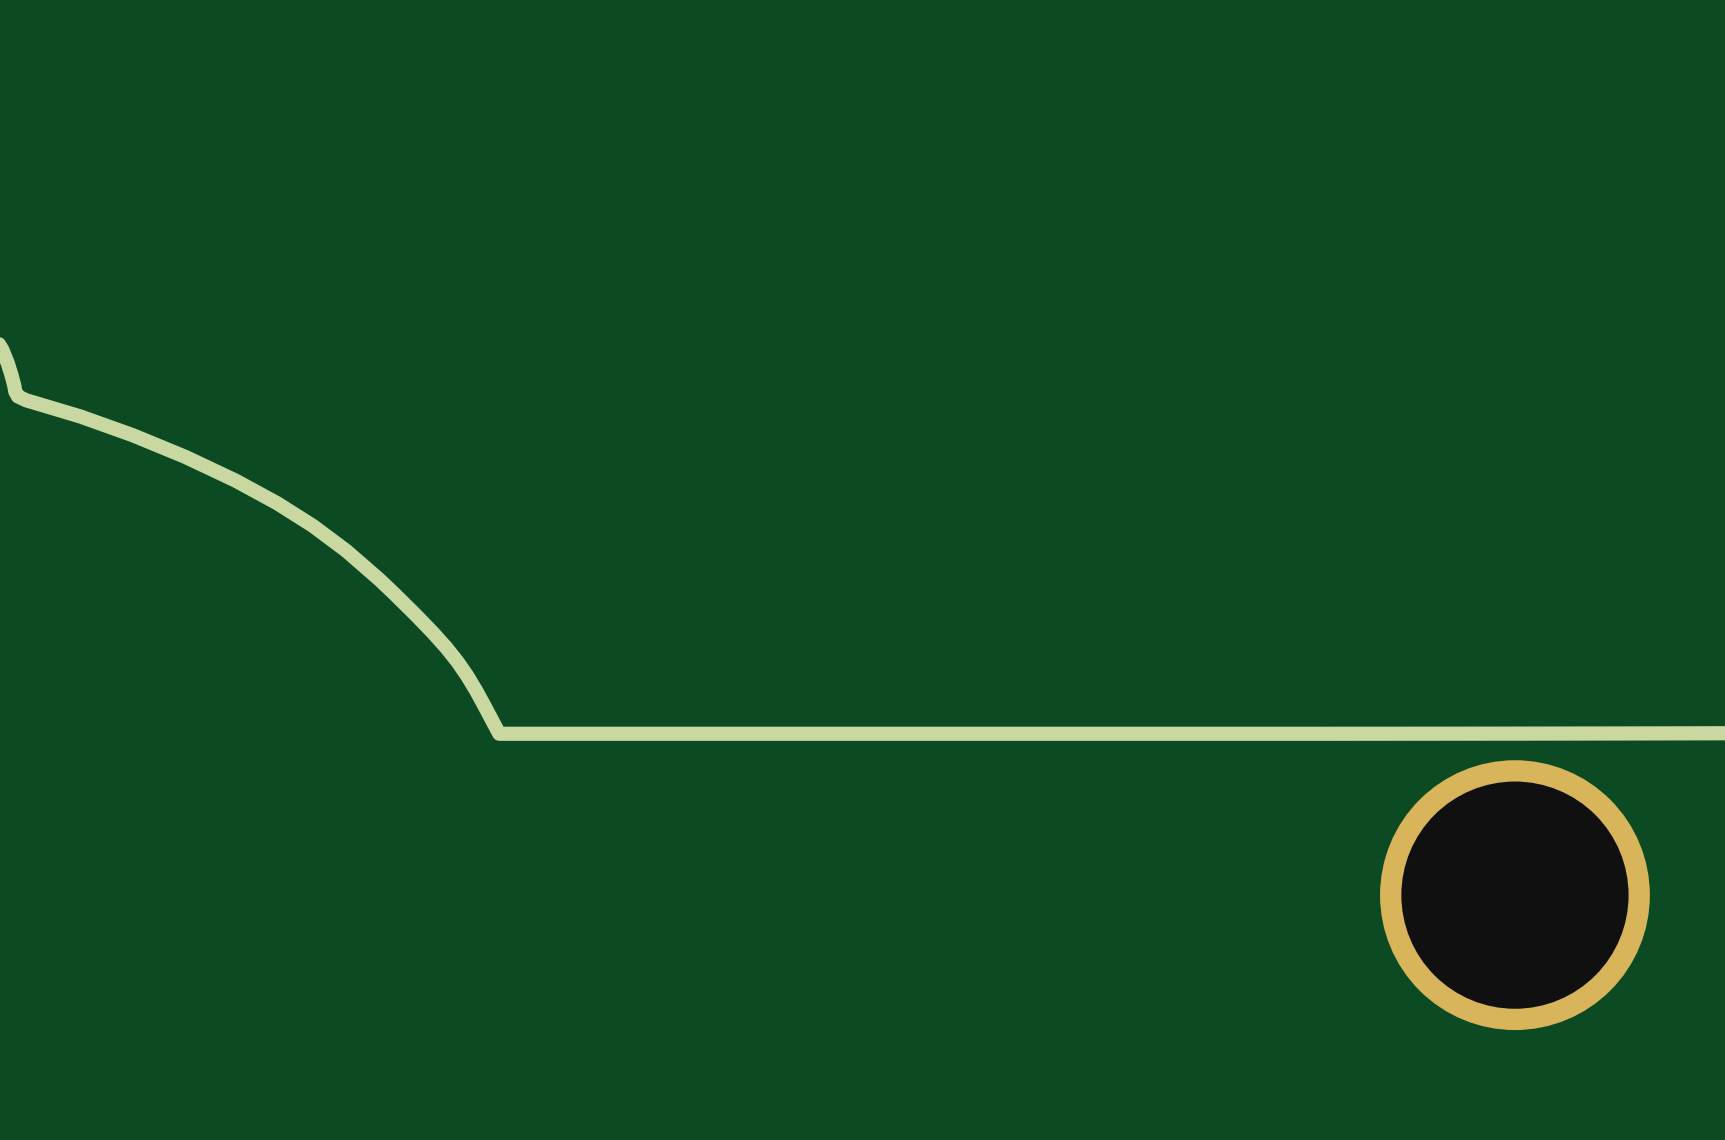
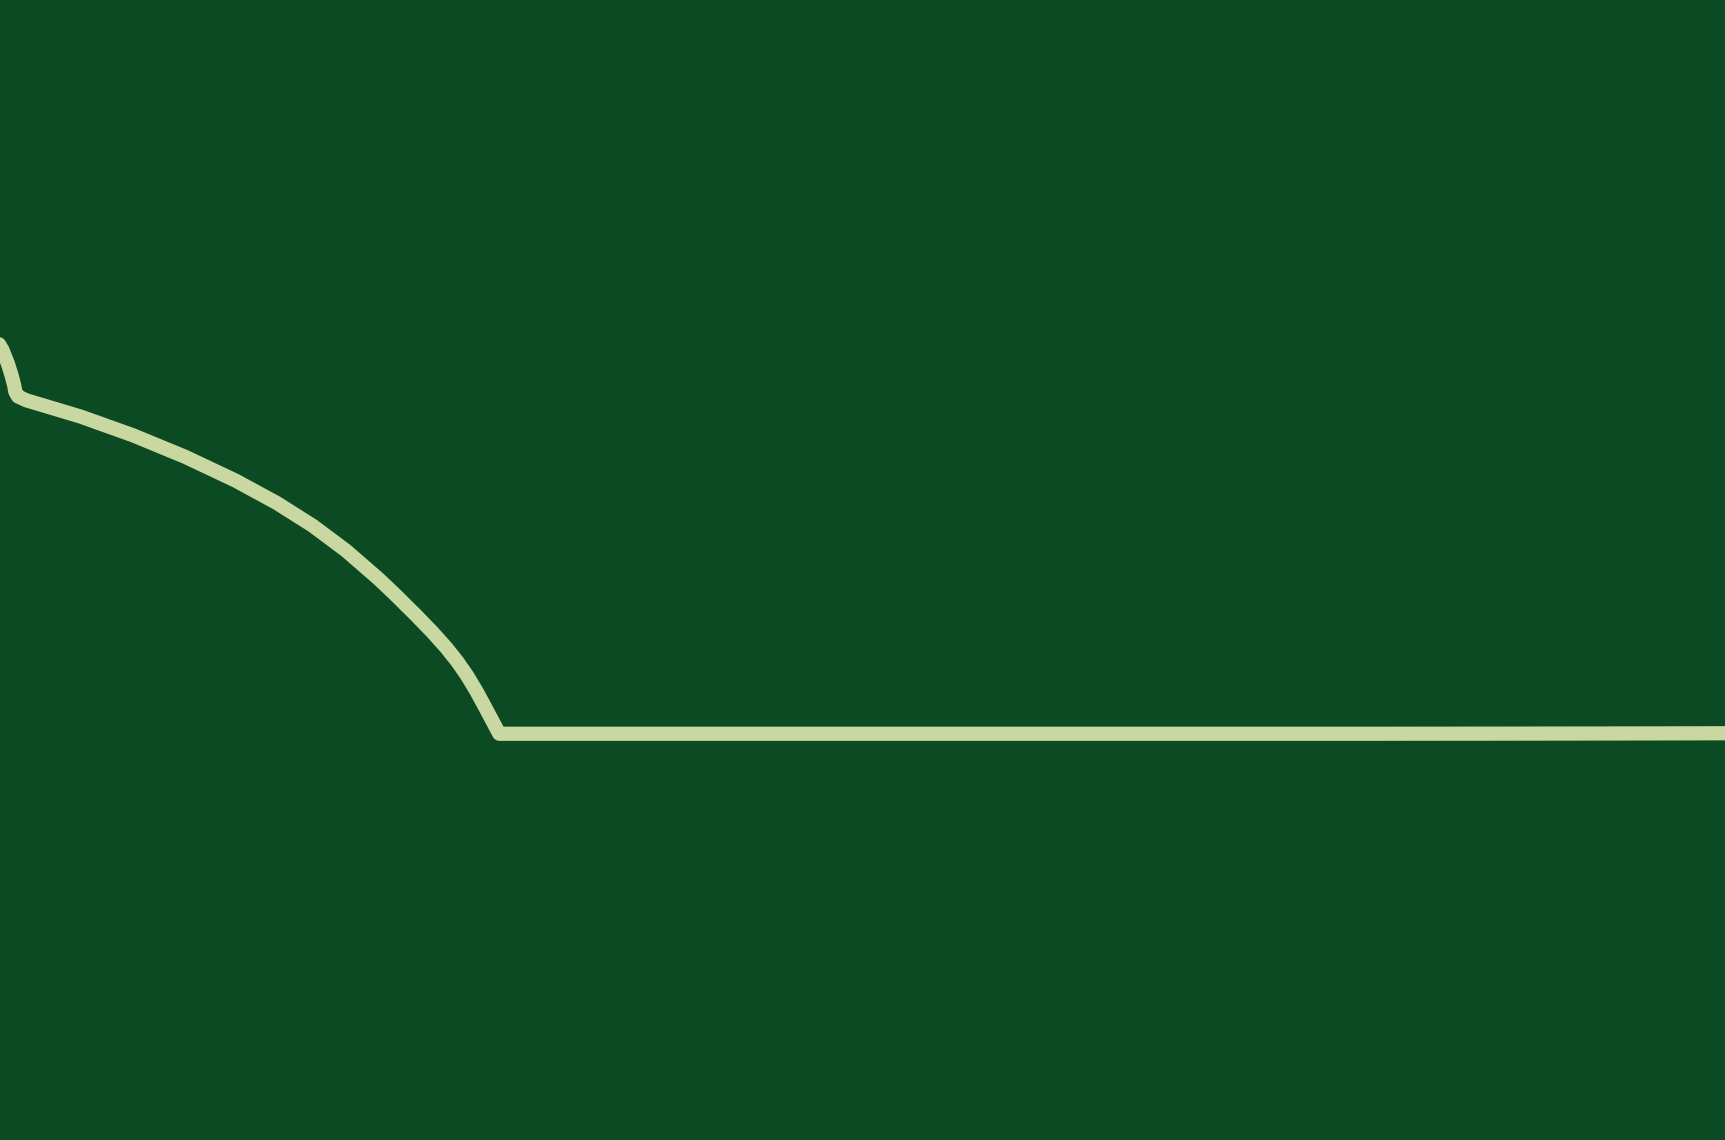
part: (1514, 895) -> none

